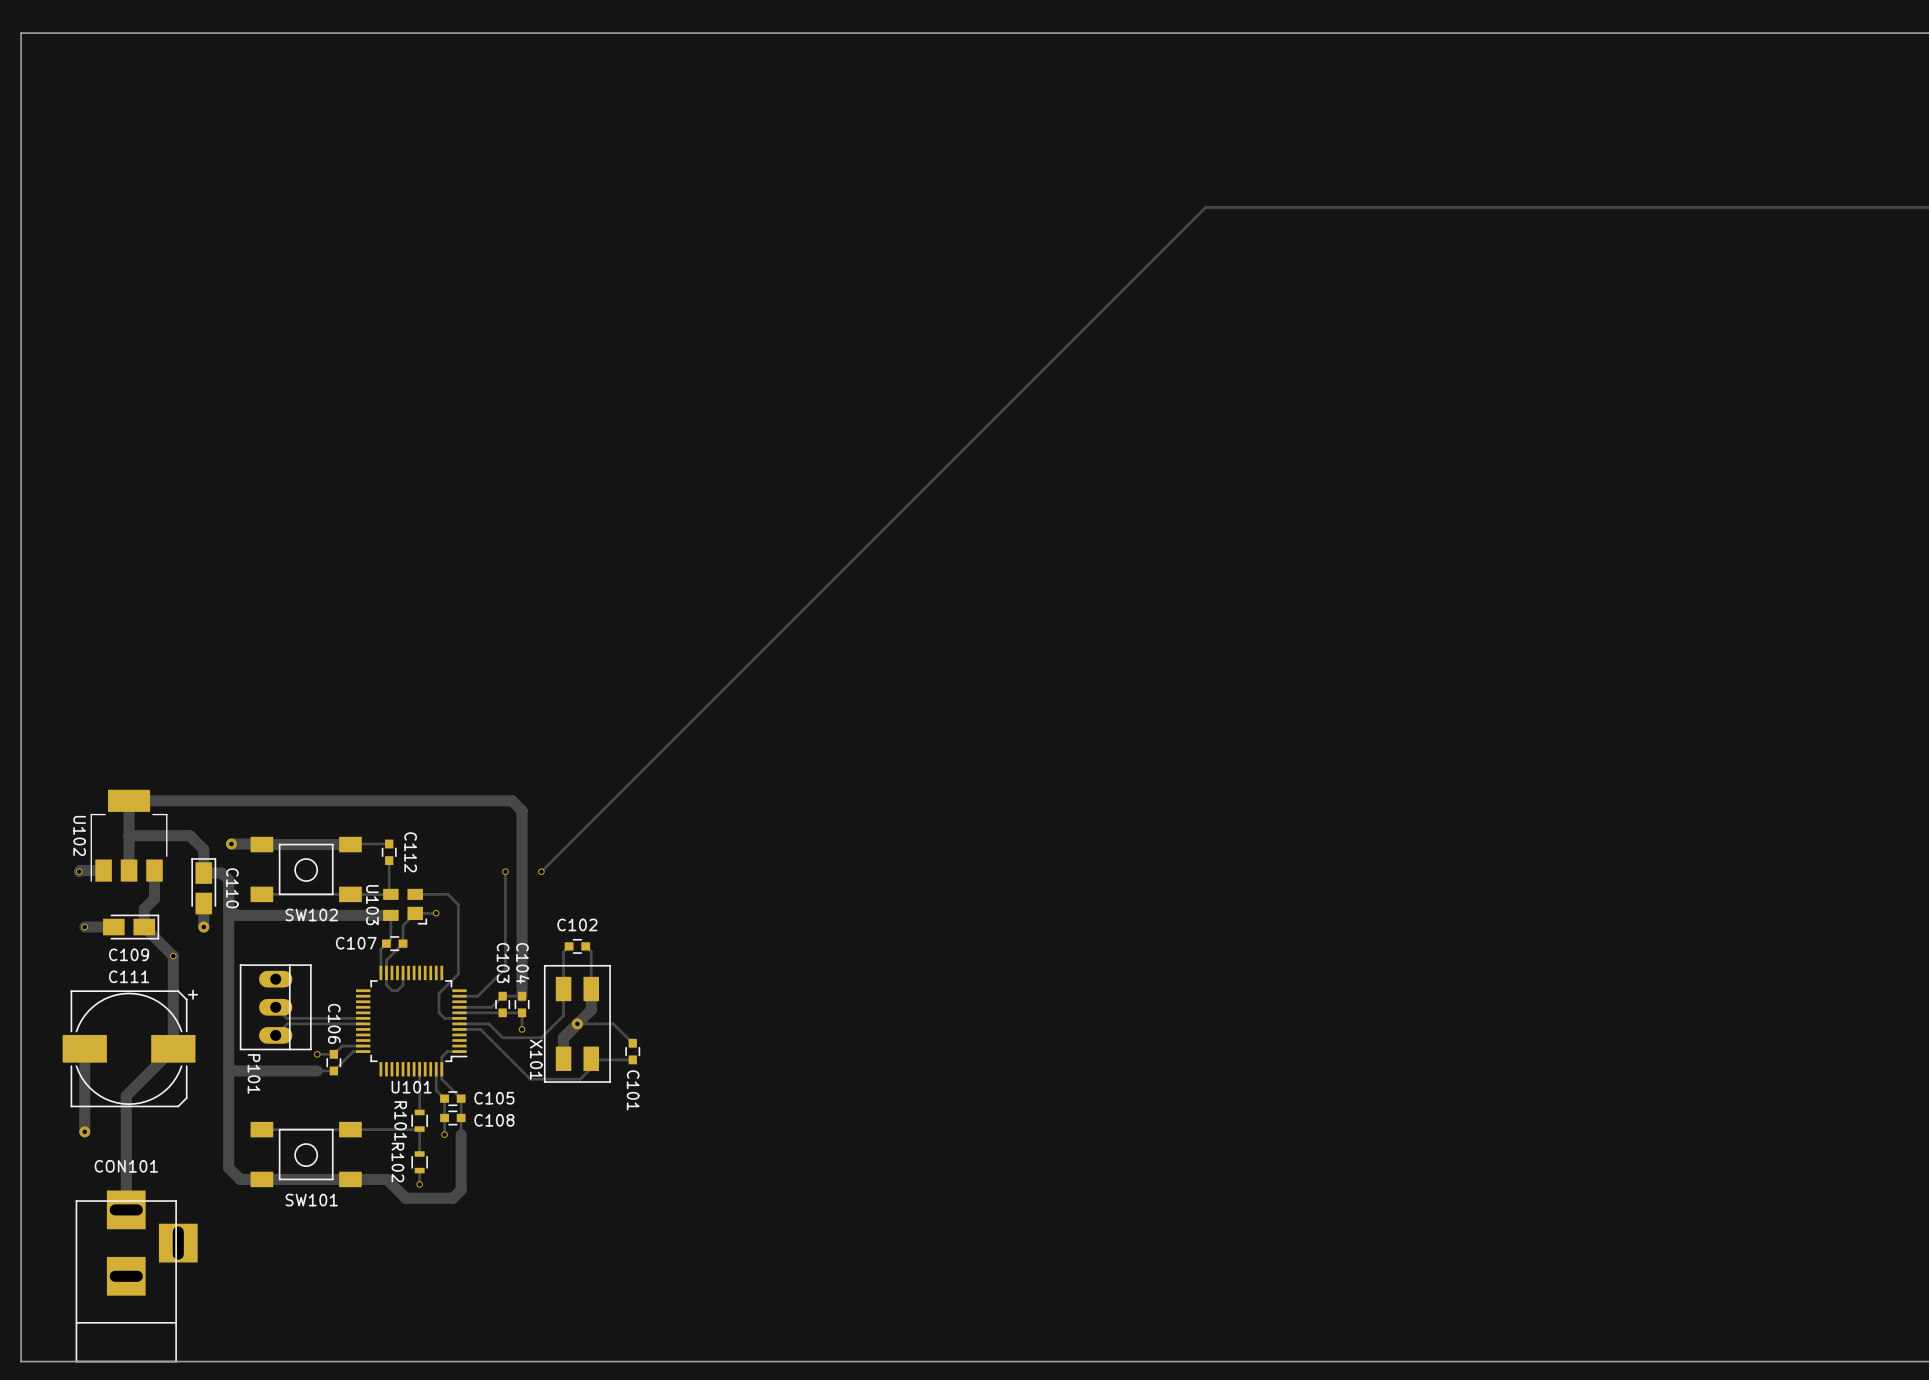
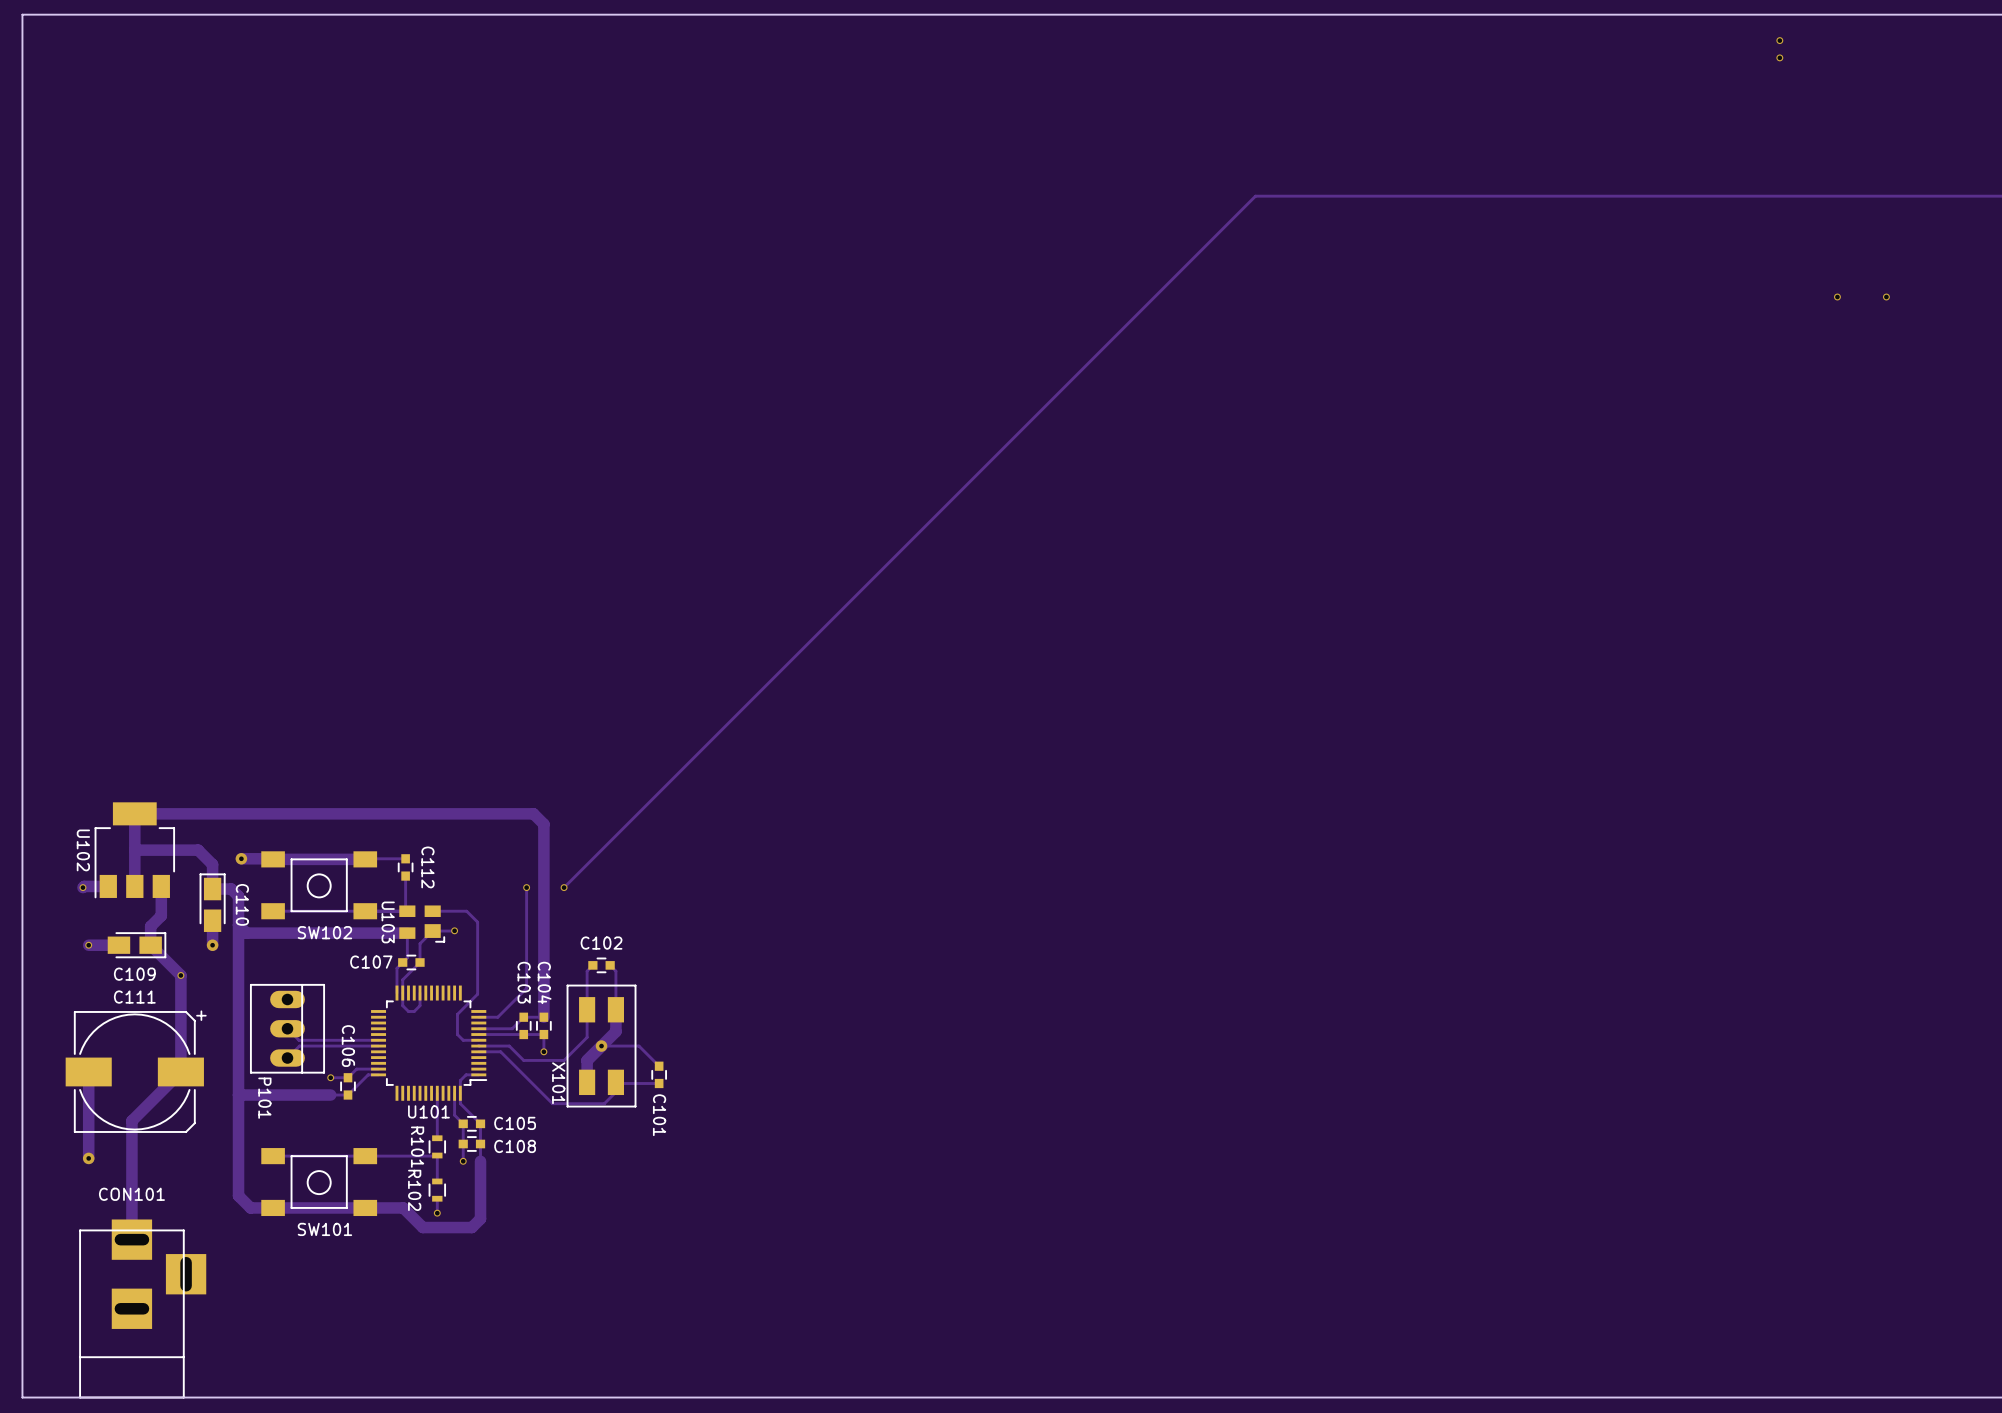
via: none -> (1779, 40)
via: none -> (1779, 57)
via: none -> (1837, 297)
via: none -> (1886, 297)

